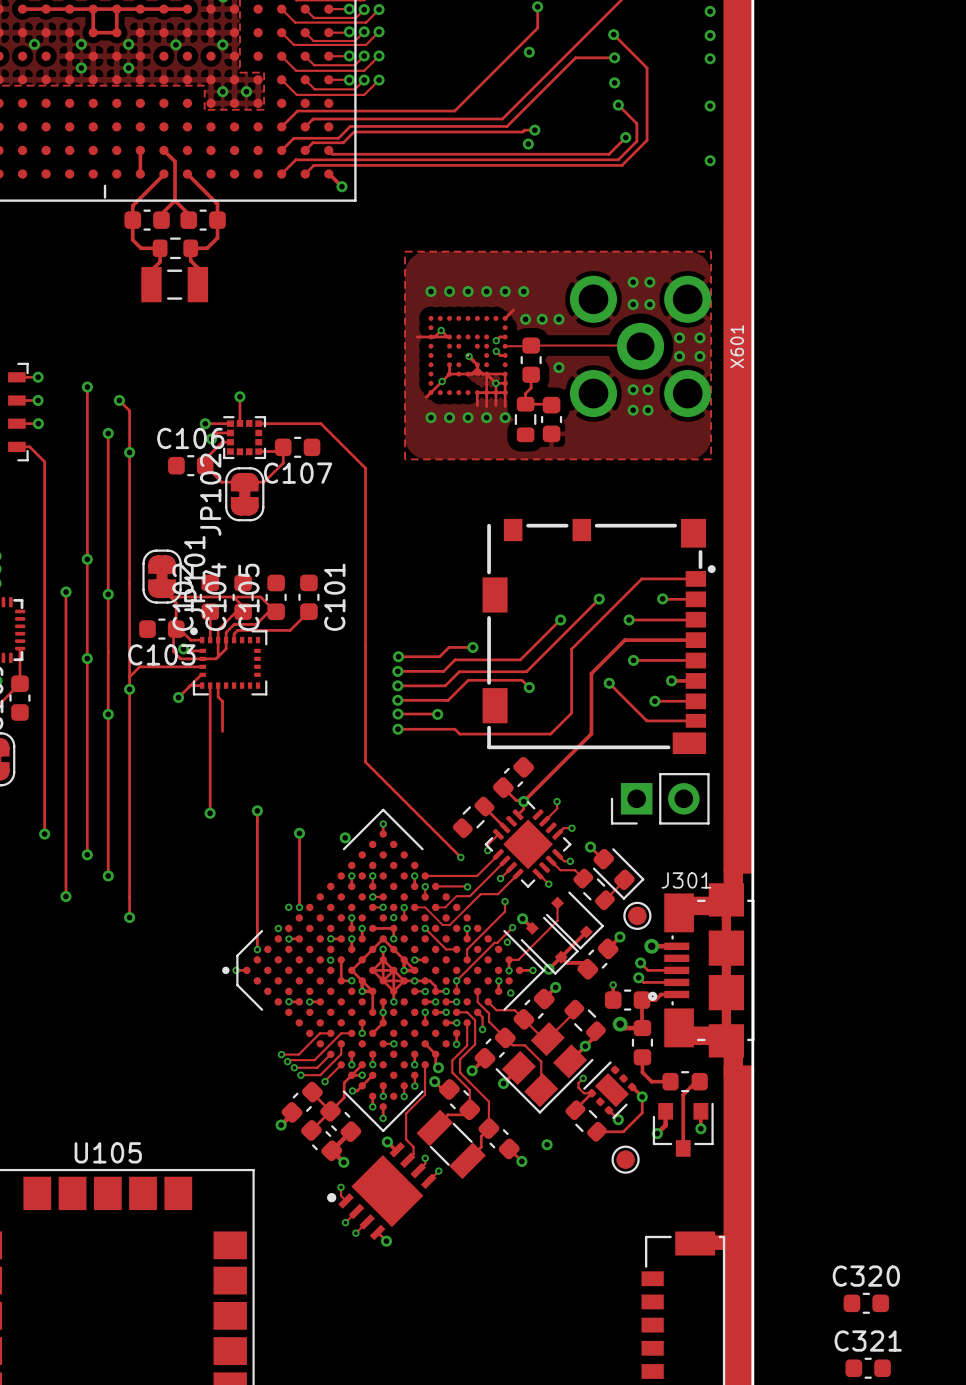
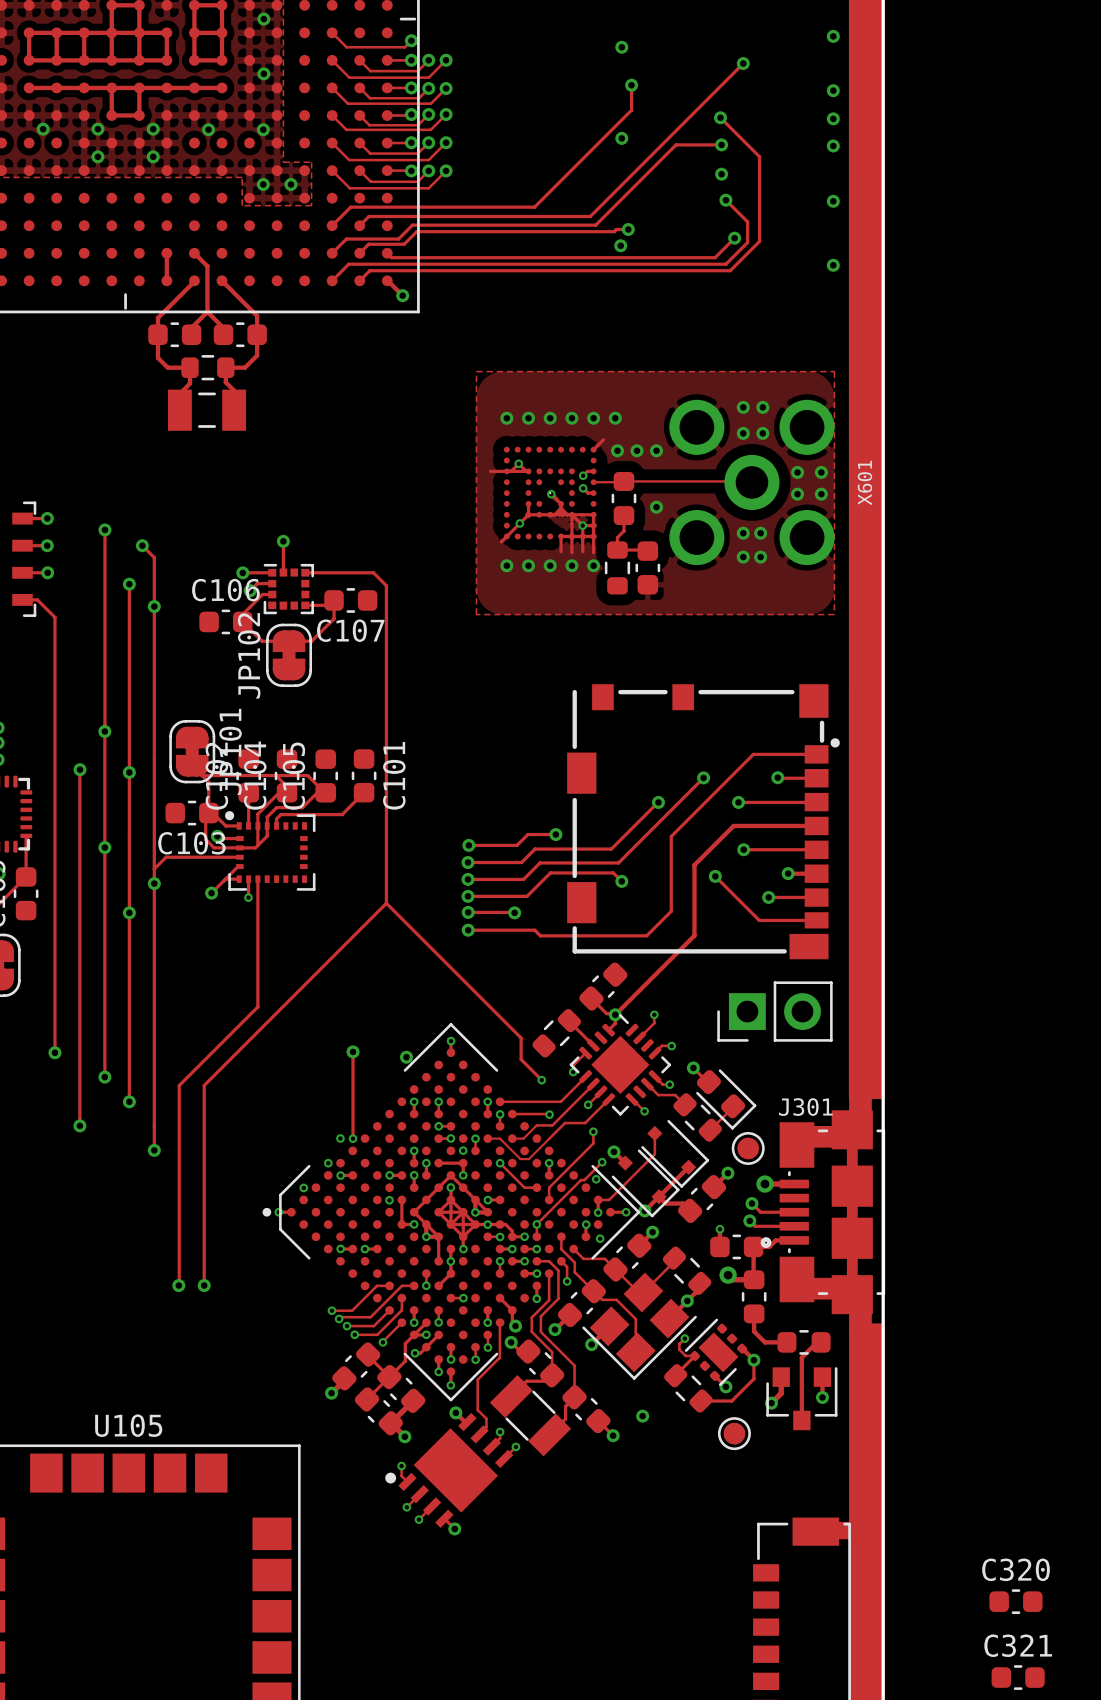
track: (317, 423) (320, 423) (365, 468) (365, 762) (443, 839) -> (373, 572) (386, 585) (386, 903)
track: (218, 697) (222, 701) (222, 731) -> (257, 892) (257, 1006) (179, 1085) (178, 1285)
track: (210, 701) (210, 813) -> none
via: none -> (248, 897)
track: none -> (386, 903) (204, 1085) (204, 1285)
track: none -> (386, 903) (521, 1038) (521, 1059)
track: (257, 810) (257, 949) -> none
via: (257, 810) -> none
via: (210, 813) -> none
via: none -> (178, 1285)
via: none -> (204, 1285)

